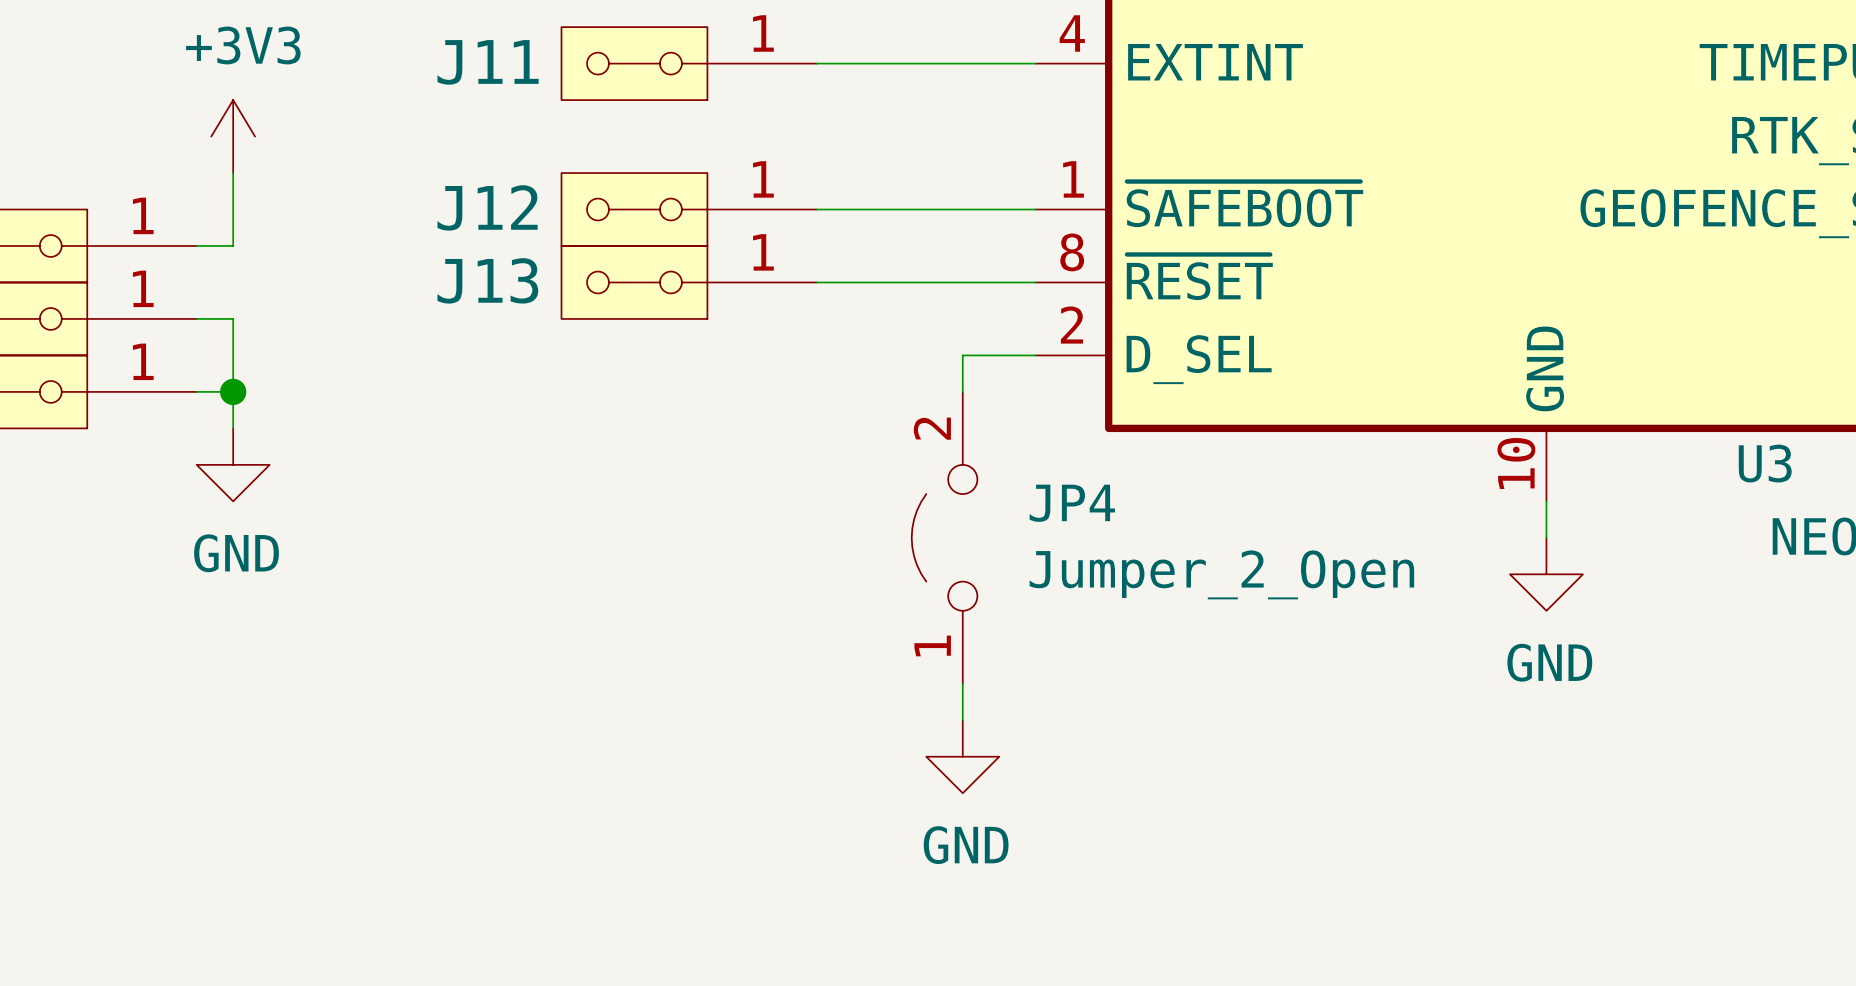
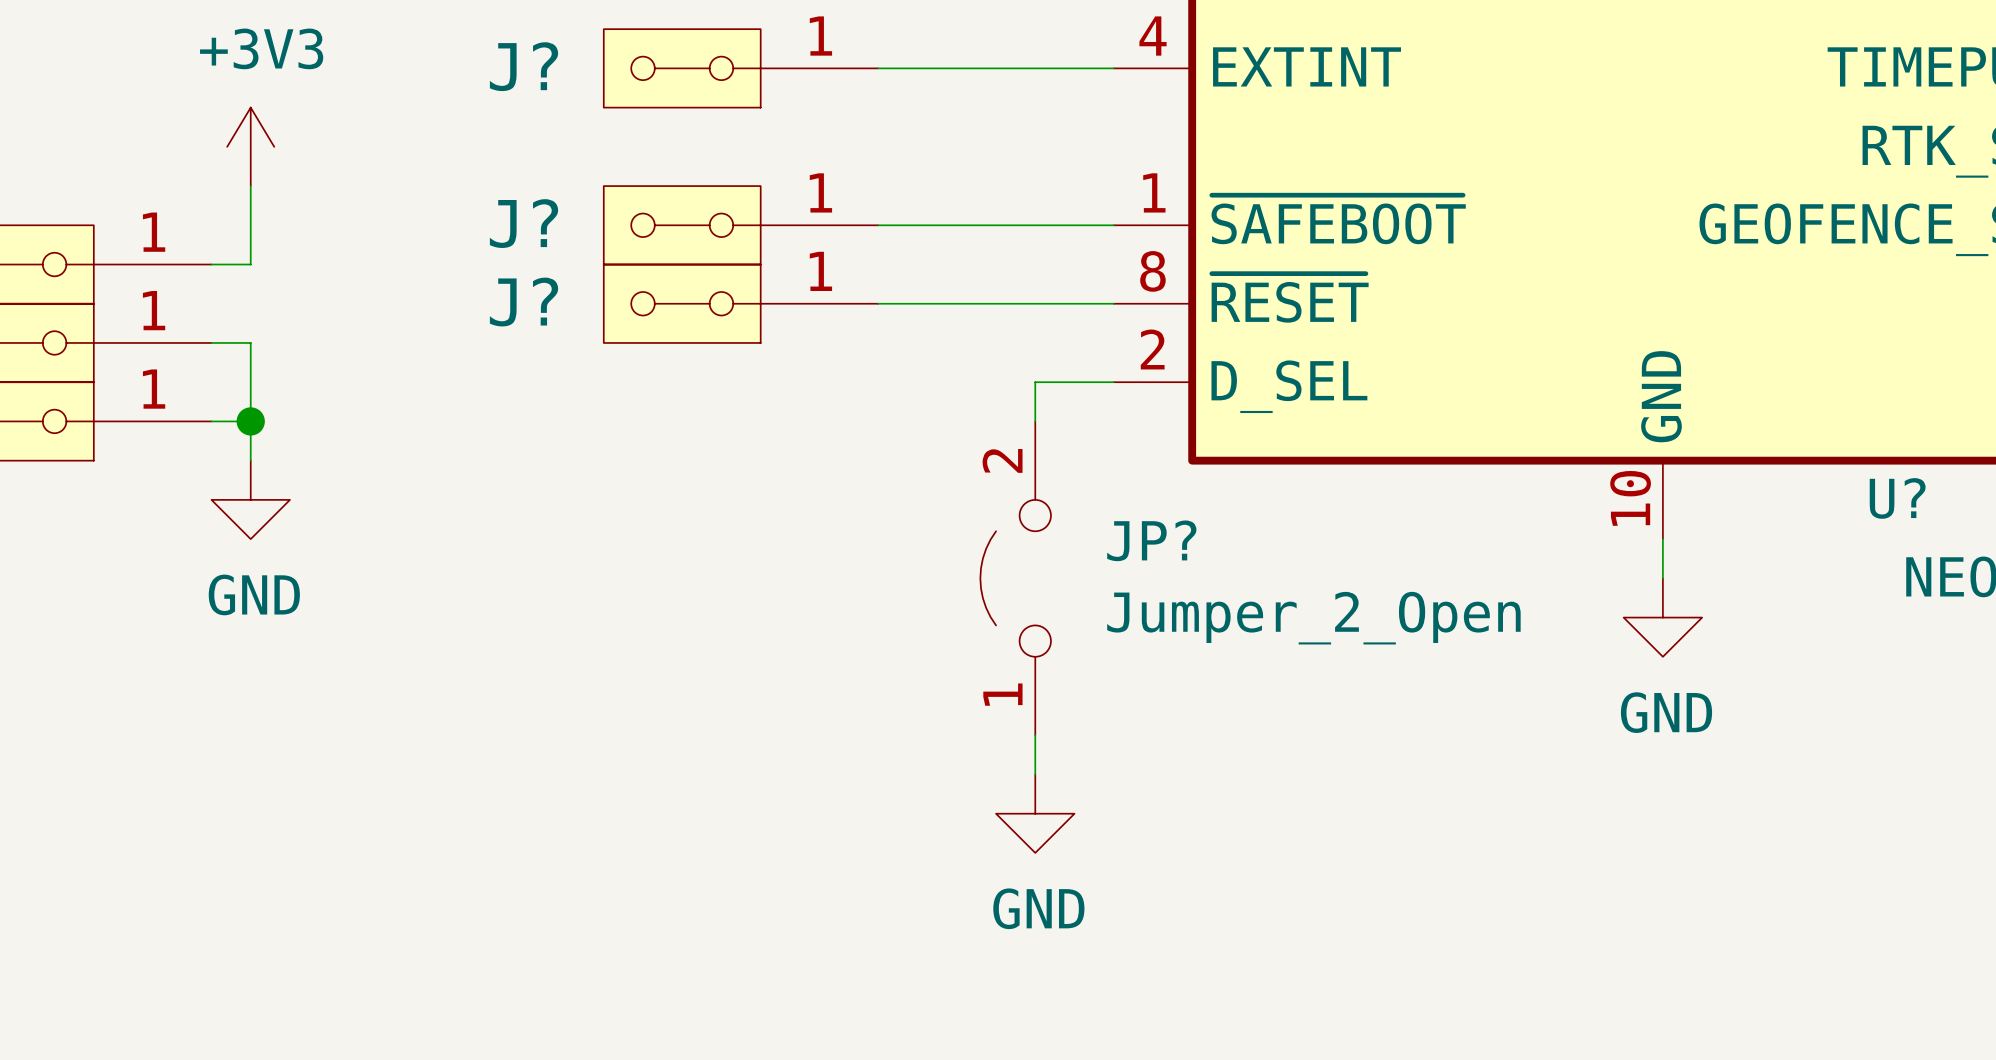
J11 name: J11 (488, 62) -> J? (524, 66)
J12 name: J12 (487, 207) -> J? (524, 223)
J13 name: J13 (487, 280) -> J? (524, 302)
U3 name: U3 (1765, 463) -> U? (1897, 498)
JP4 name: JP4 (1072, 503) -> JP? (1151, 540)

